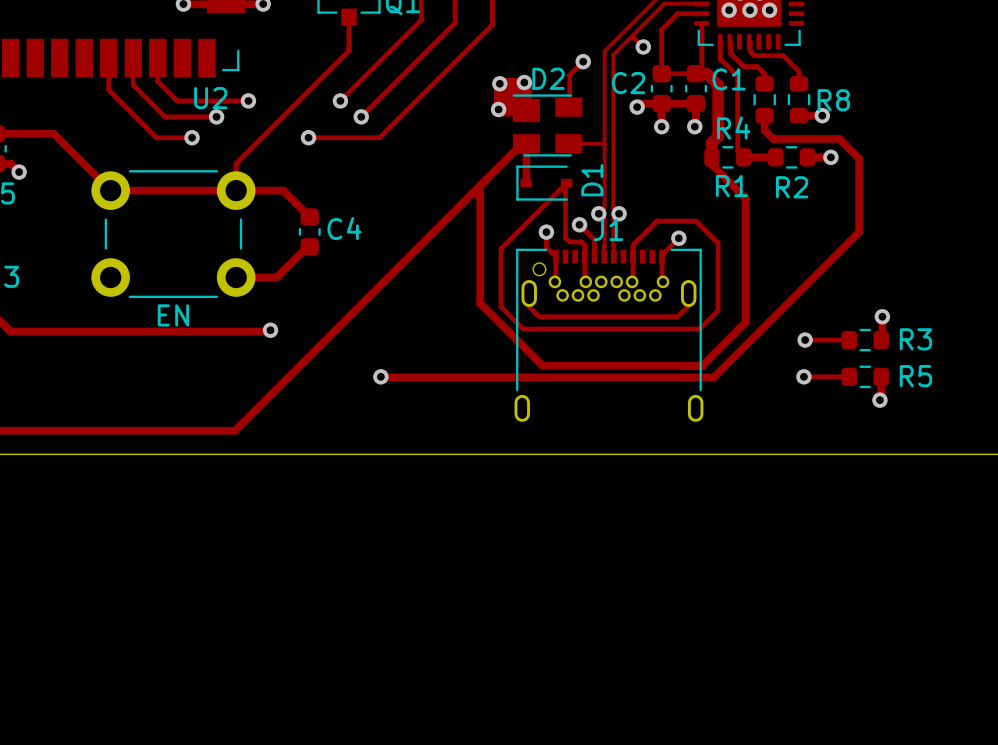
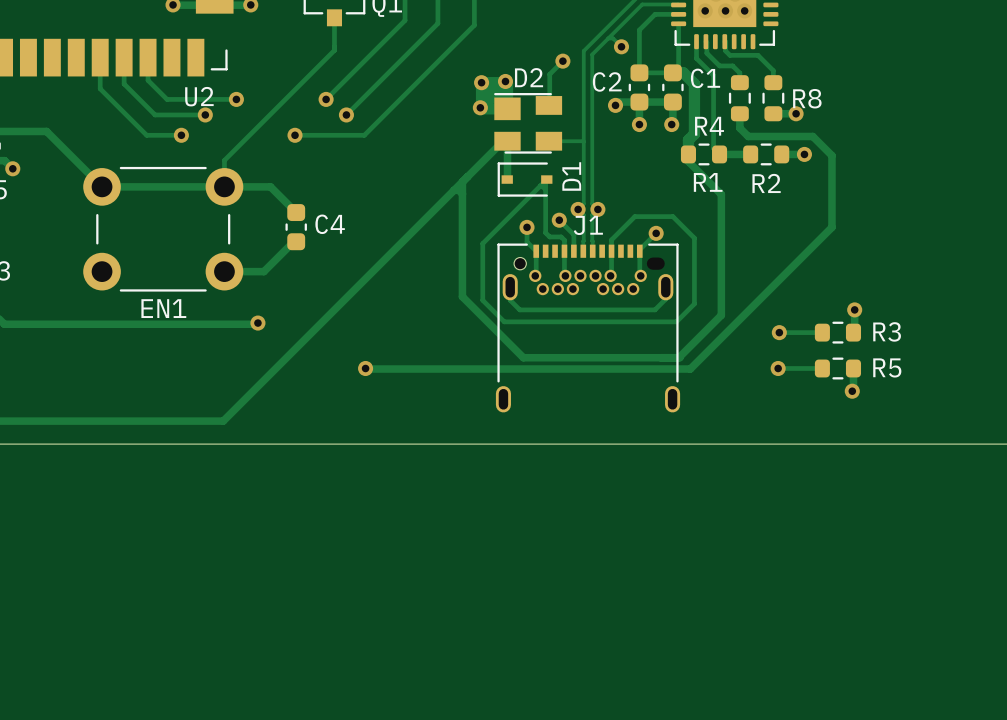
EN name: EN (173, 315) -> EN1 (163, 308)

